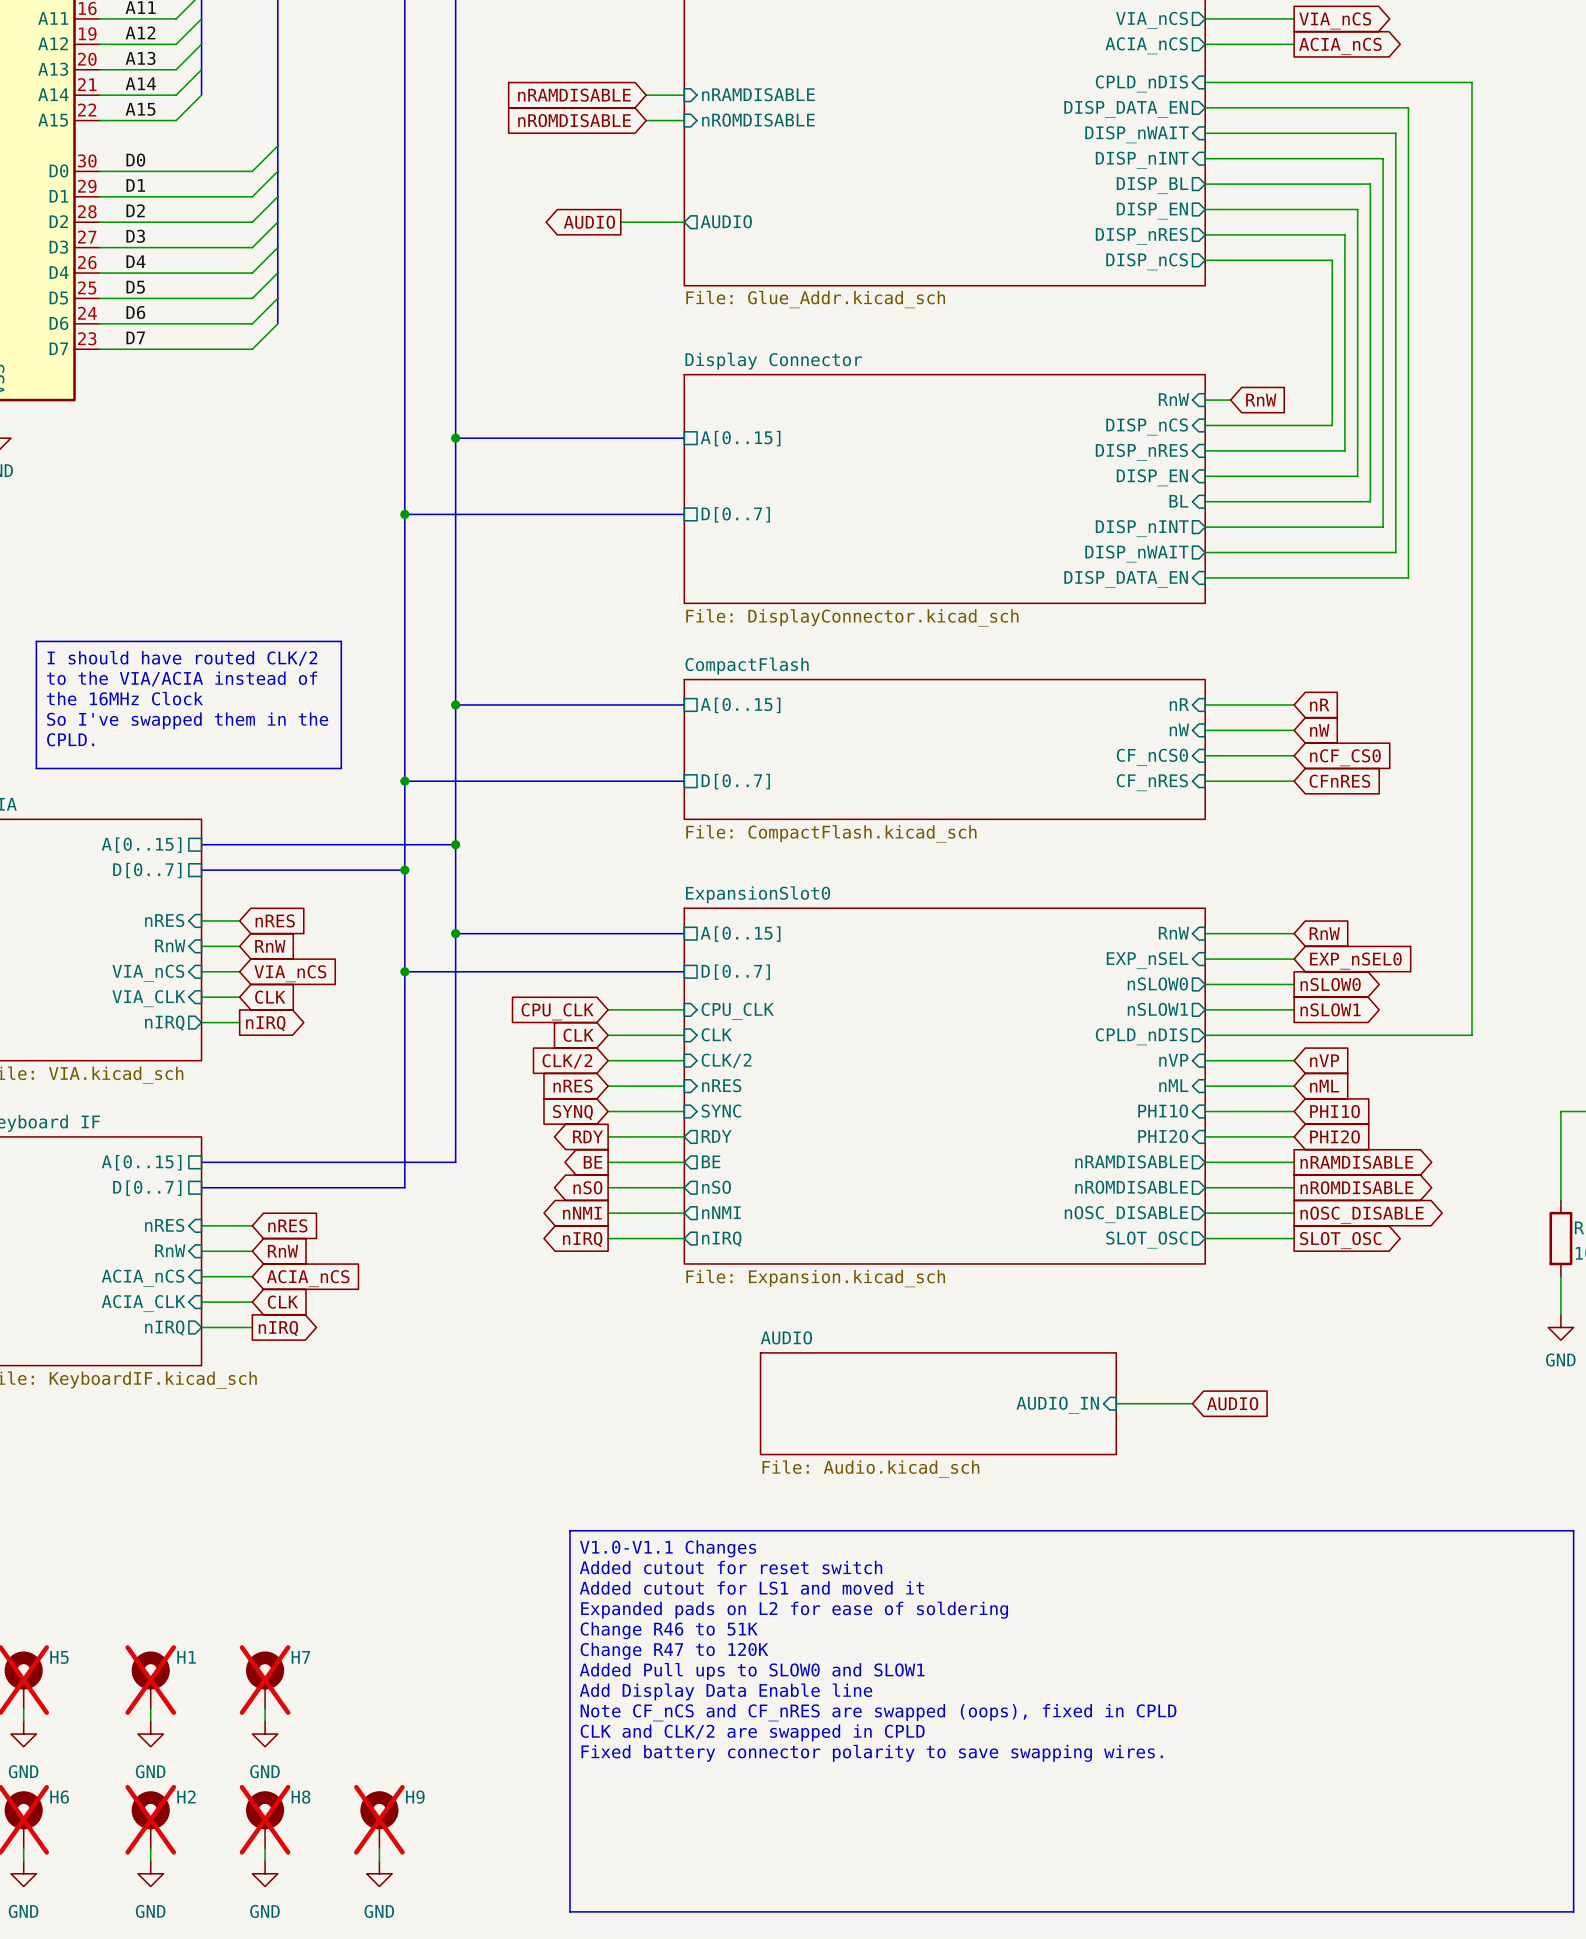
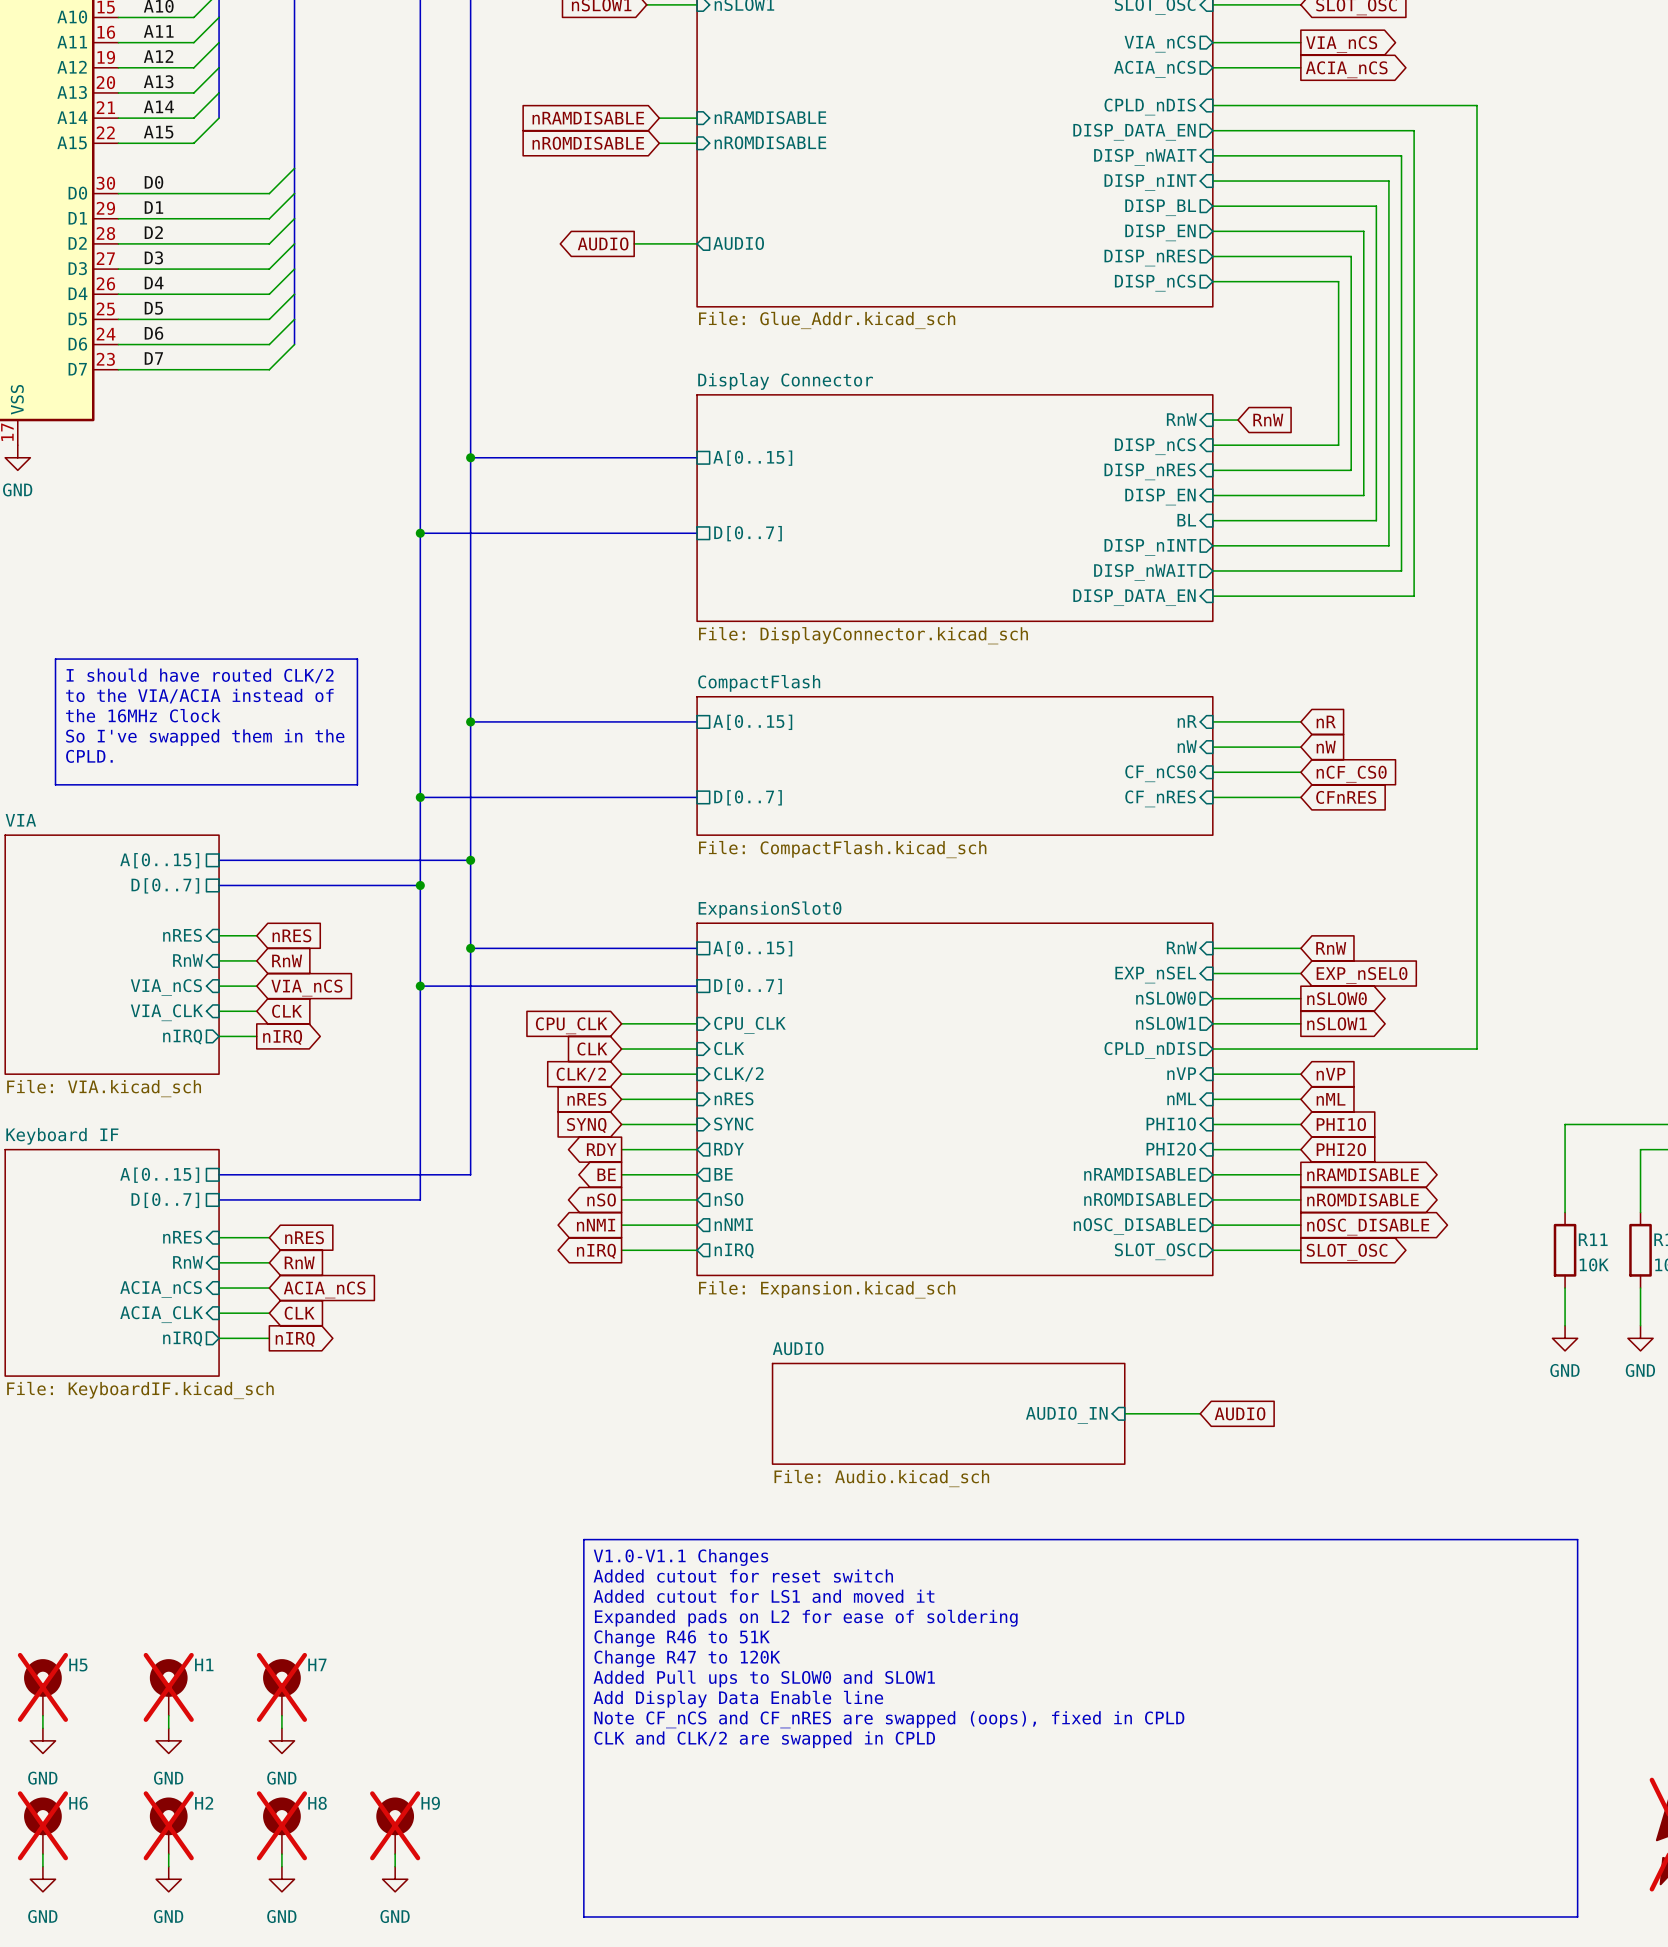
text: Fixed battery connector polarity to save swapping wires. (872, 1753) -> none

